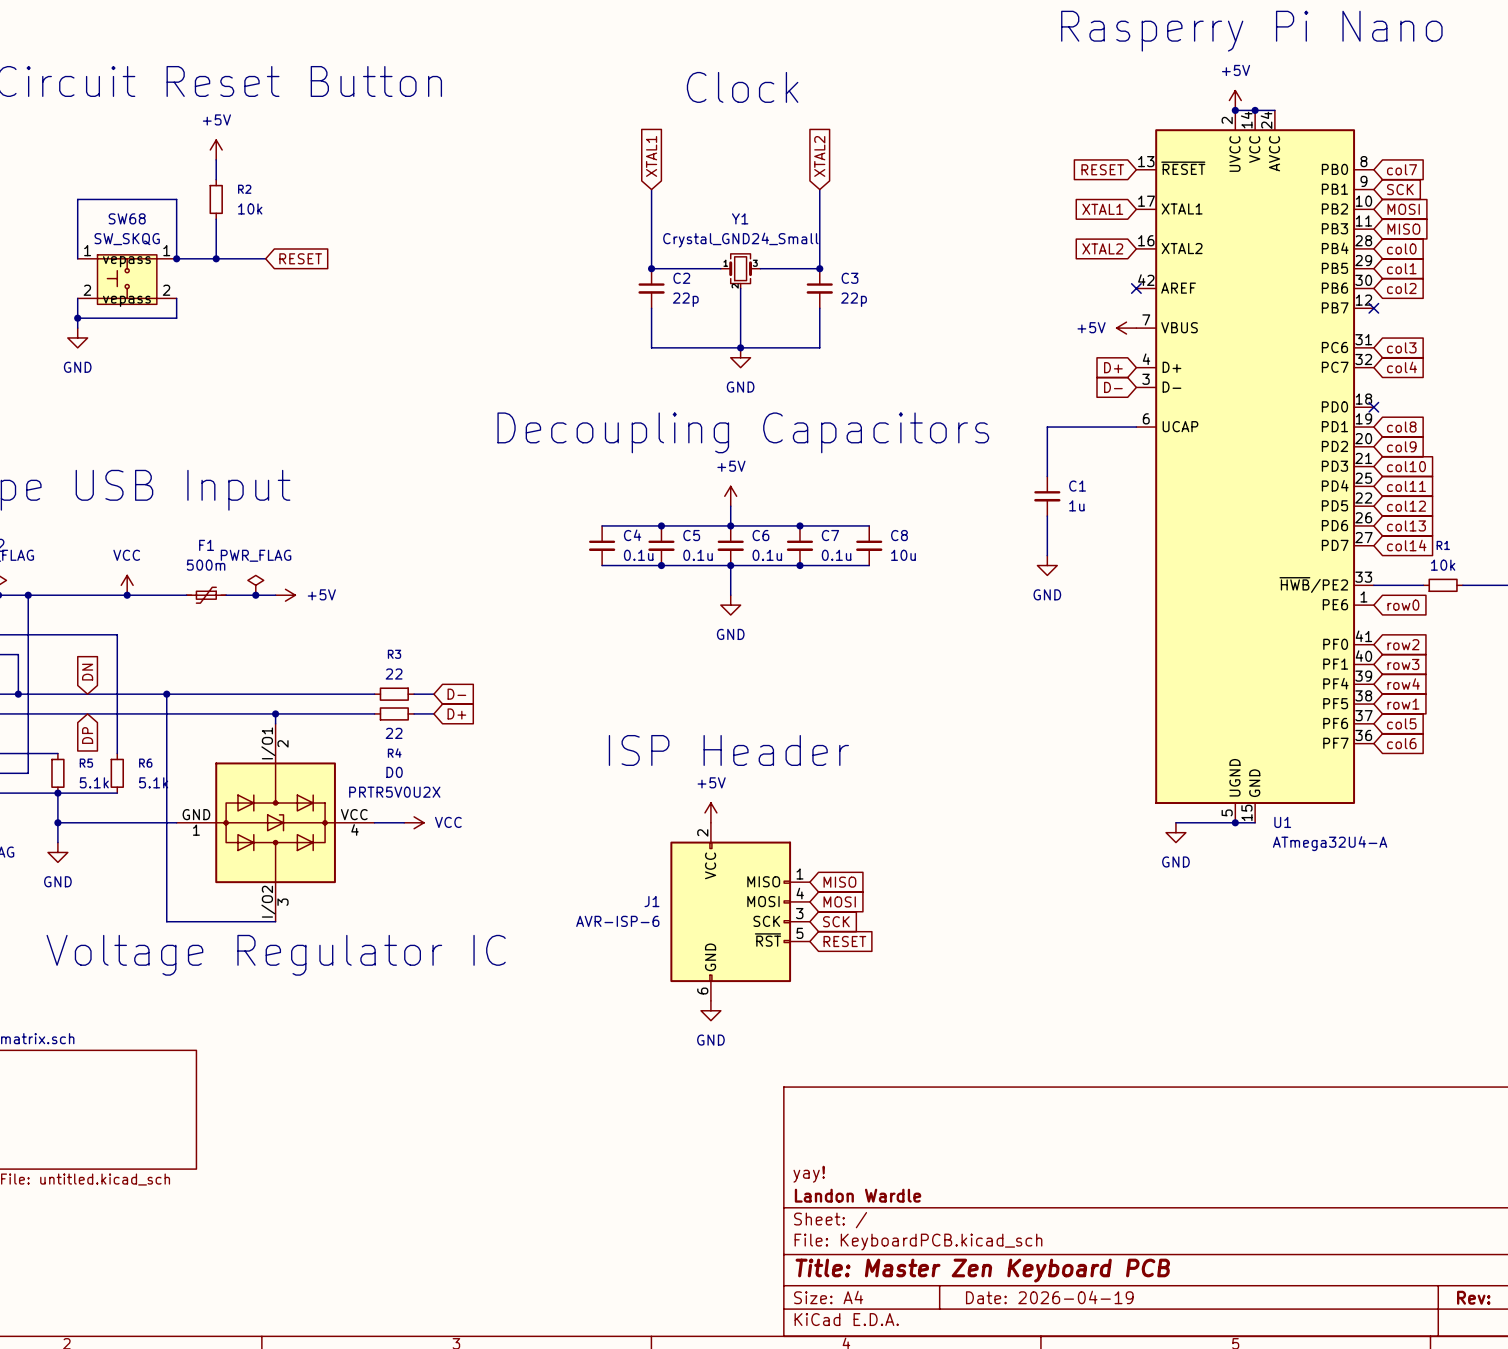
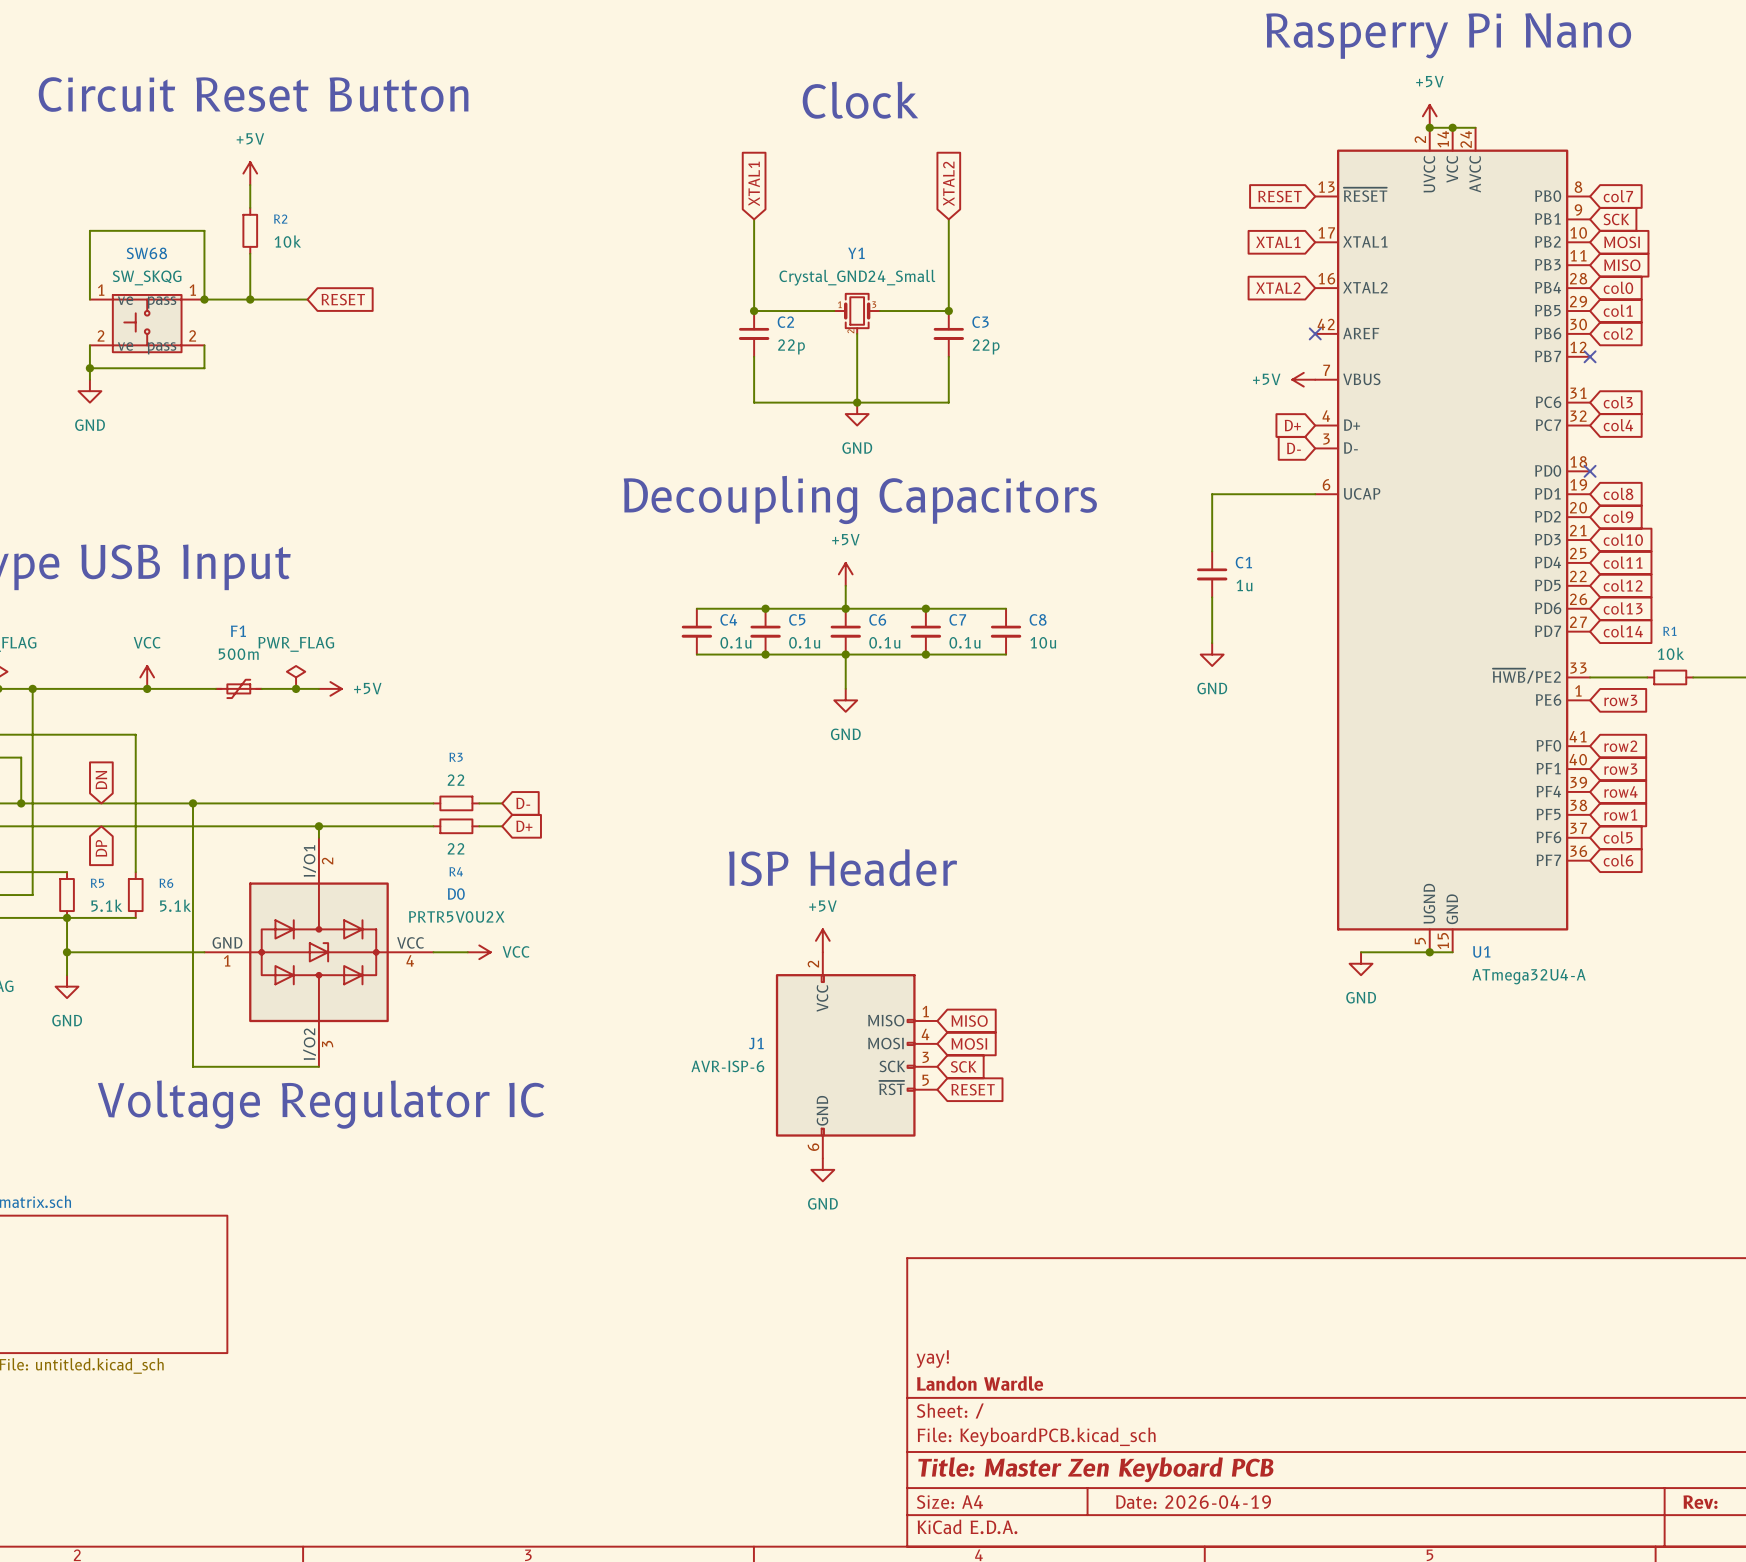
global label: row0 (1403, 605) -> row3 (1620, 700)

